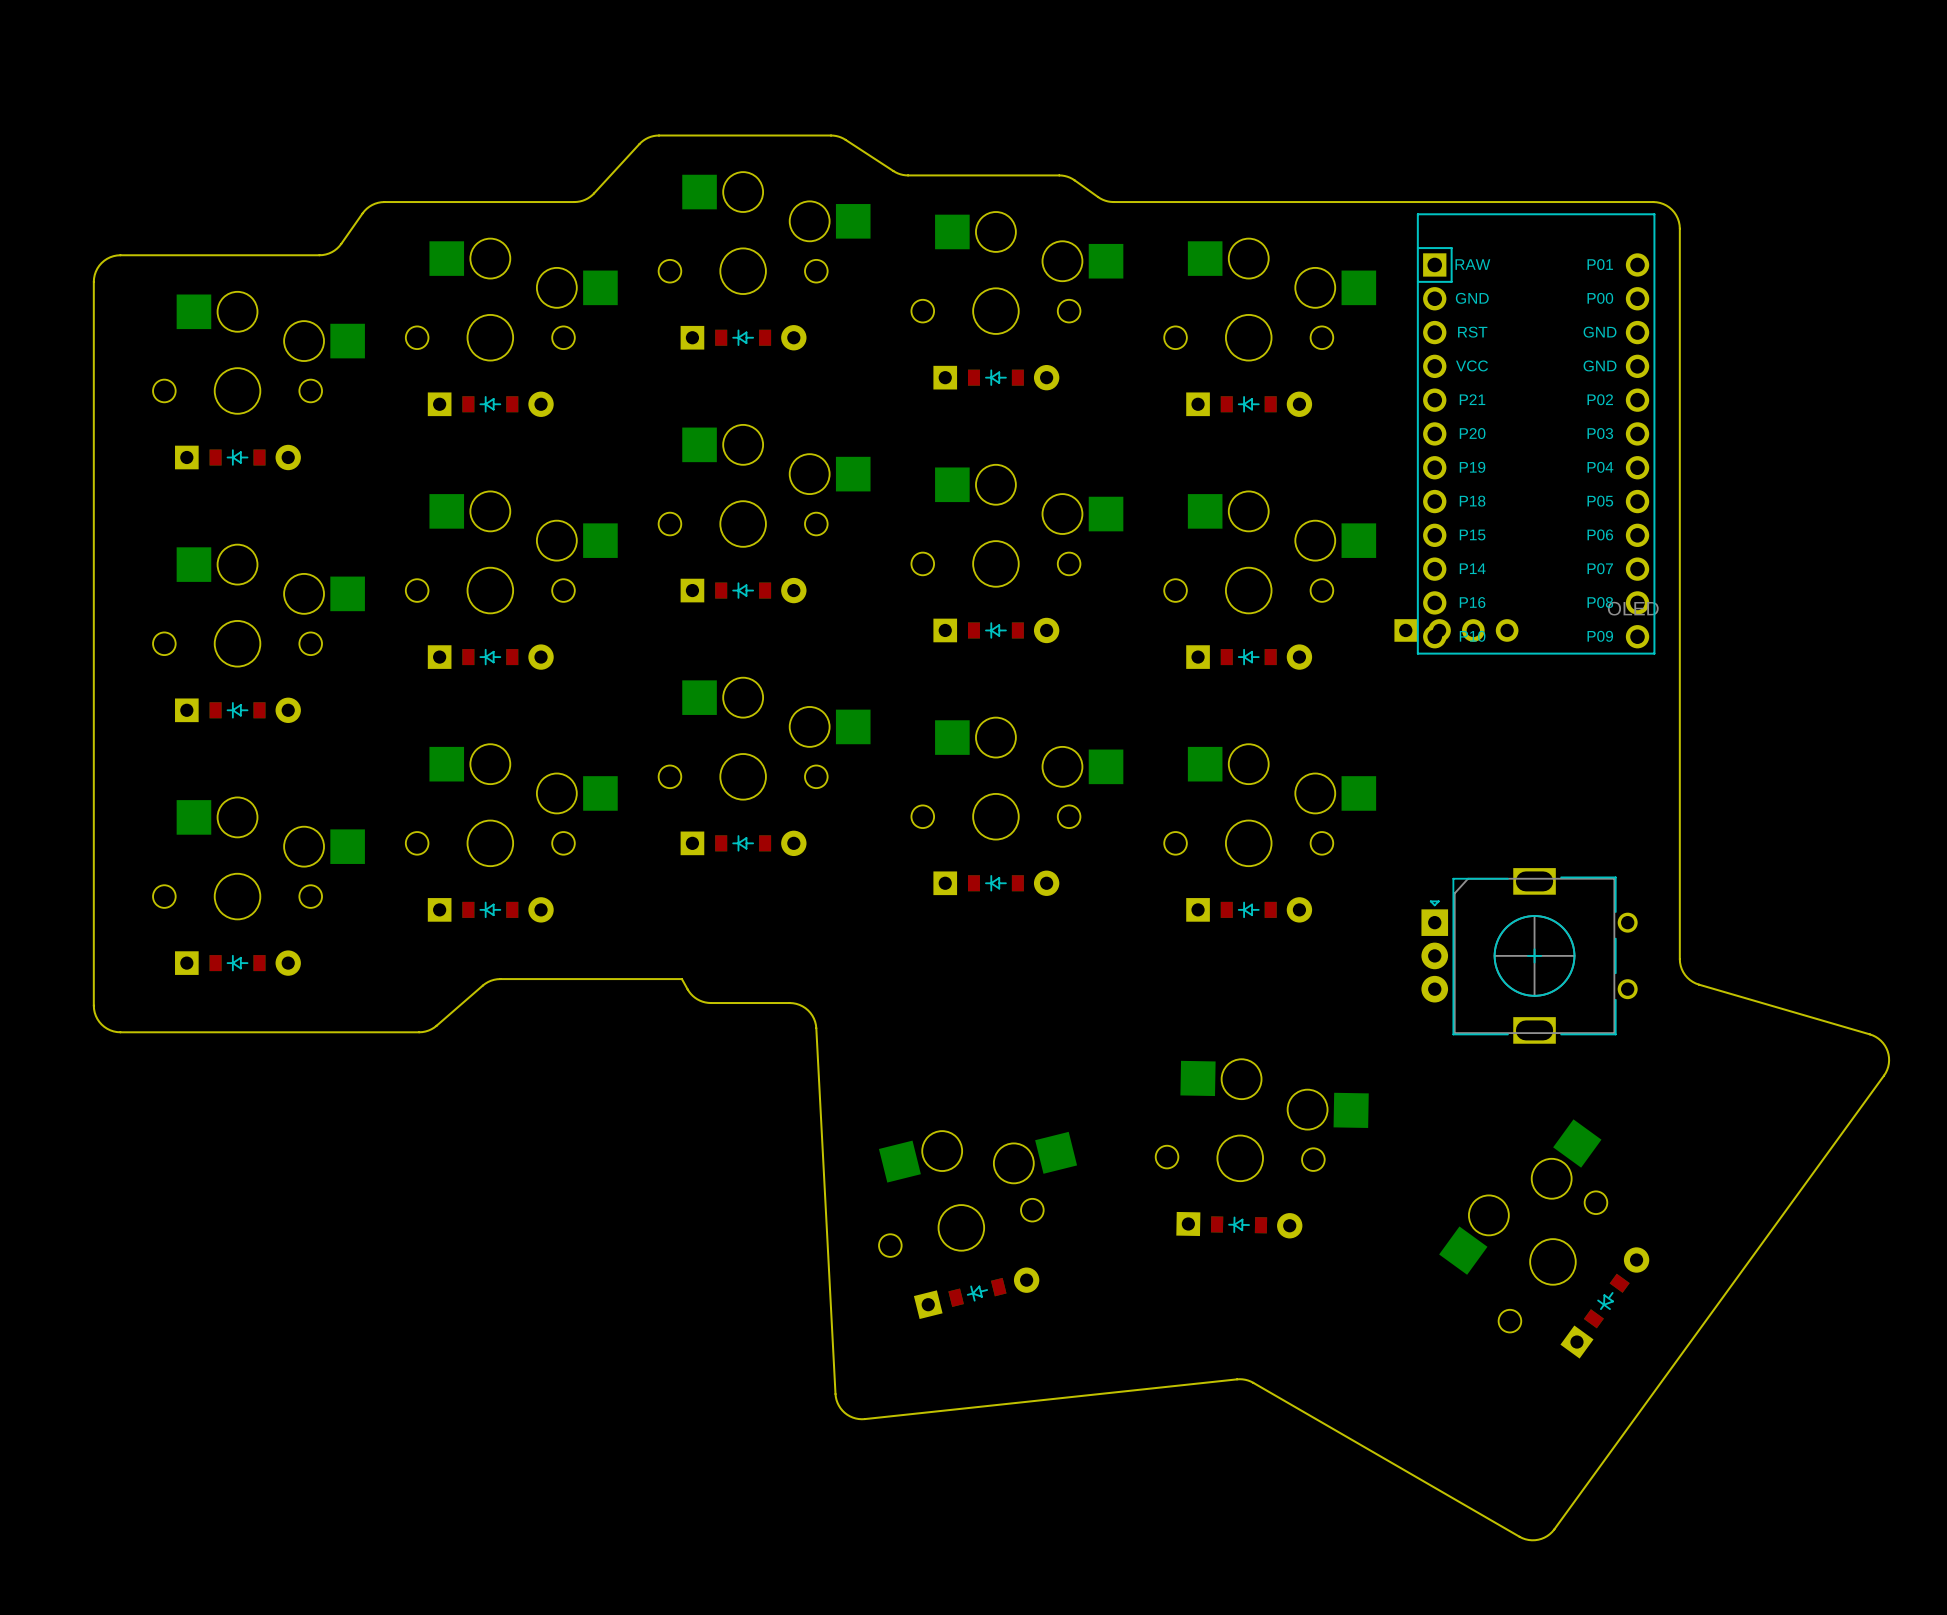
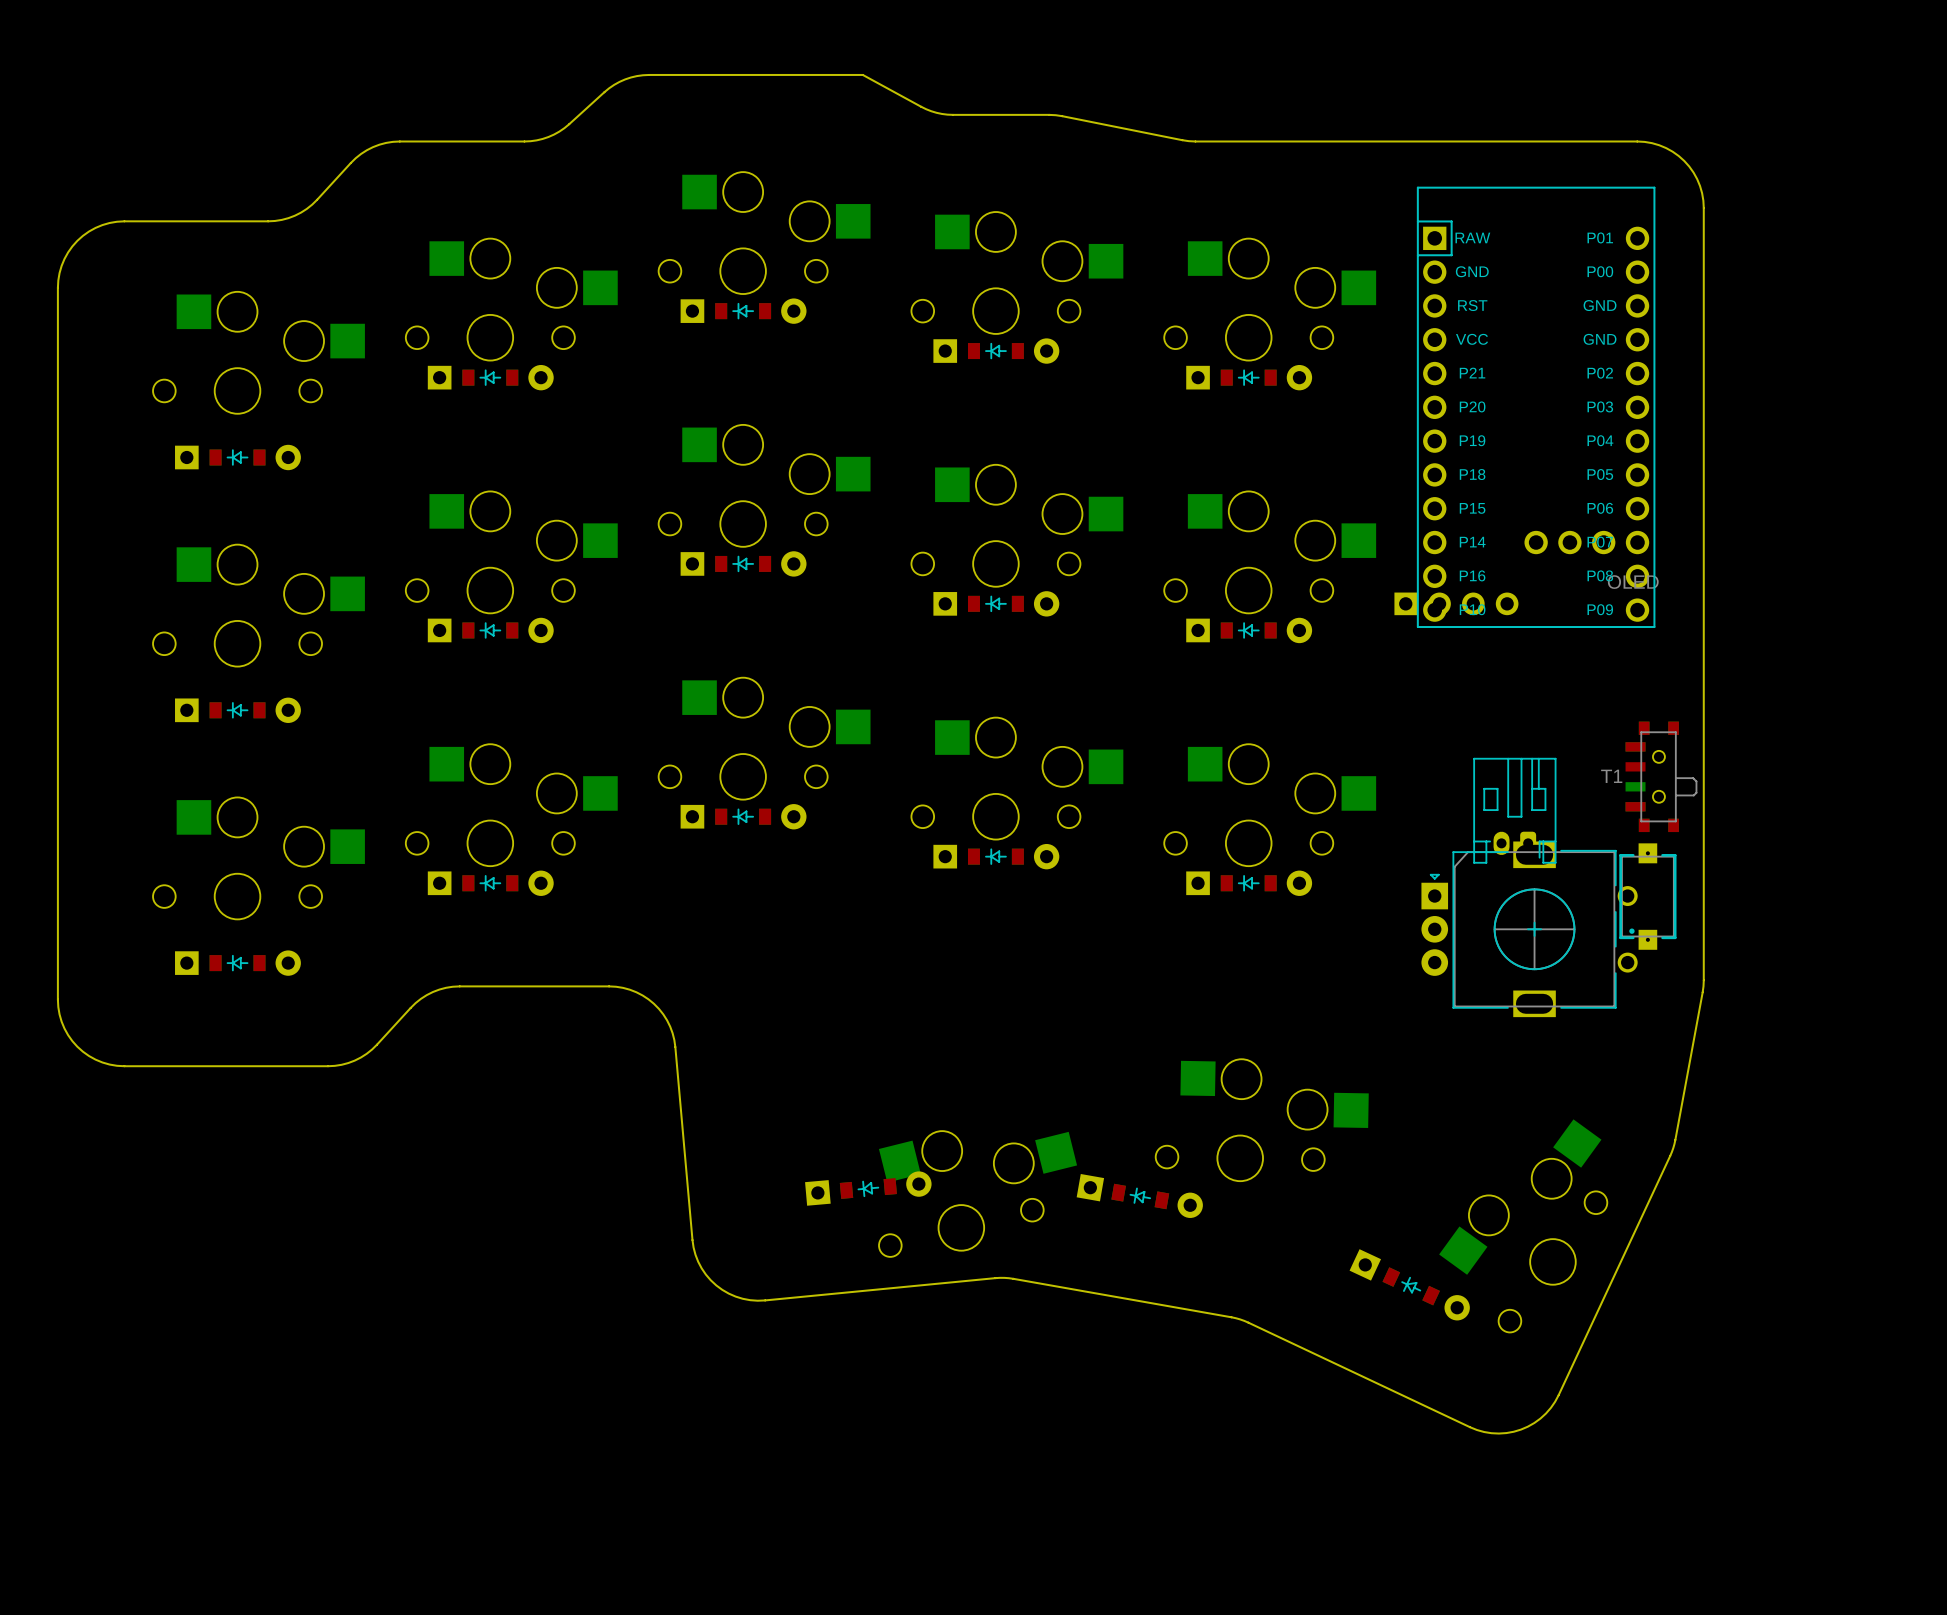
board edge: (659, 135) (836, 135) (902, 174) (1062, 175) (1072, 178) (1100, 198) (1110, 201) (1653, 202) (1666, 205) (1676, 215) (1679, 228) (1680, 965) (1687, 977) (1699, 984) (1872, 1035) (1884, 1045) (1888, 1054) (1888, 1063) (1884, 1075) (1554, 1529) (1547, 1536) (1531, 1540) (1519, 1536) (1245, 1379) (864, 1419) (855, 1418) (847, 1414) (838, 1405) (835, 1394) (815, 1024) (810, 1012) (799, 1004) (789, 1003) (705, 1002) (692, 995) (681, 979) (500, 979) (485, 983) (434, 1027) (422, 1032) (120, 1032) (107, 1028) (97, 1018) (93, 1005) (93, 281) (97, 268) (107, 258) (120, 255) (325, 254) (339, 246) (366, 208) (381, 202) (579, 201) (592, 195) (641, 142) (650, 136) (659, 135) -> (649, 74) (630, 77) (614, 84) (564, 128) (542, 138) (524, 141) (399, 141) (373, 147) (355, 158) (312, 204) (288, 218) (268, 221) (116, 221) (102, 225) (89, 231) (77, 240) (68, 252) (59, 273) (57, 287) (57, 999) (59, 1014) (68, 1035) (77, 1046) (89, 1056) (102, 1062) (116, 1065) (334, 1065) (348, 1063) (366, 1053) (415, 1003) (439, 989) (459, 986) (623, 987) (642, 995) (653, 1003) (667, 1020) (672, 1033) (693, 1247) (698, 1261) (705, 1274) (716, 1285) (728, 1293) (742, 1298) (765, 1300) (995, 1278) (1013, 1278) (1240, 1319) (1470, 1427) (1484, 1432) (1499, 1433) (1513, 1431) (1534, 1422) (1545, 1413) (1558, 1395) (1671, 1152) (1703, 986) (1703, 208) (1700, 186) (1693, 172) (1684, 160) (1672, 151) (1659, 145) (1644, 141) (1188, 141) (1055, 115) (942, 113) (921, 106) (862, 74) (649, 74)
part position: (743, 337) -> (743, 311)
part position: (996, 377) -> (996, 351)
part position: (490, 404) -> (490, 377)
part position: (1249, 404) -> (1249, 377)
part: none -> (1536, 407)
part: (1536, 433) -> none
part position: (743, 590) -> (743, 563)
part position: (996, 630) -> (996, 603)
part position: (1456, 630) -> (1456, 603)
part position: (490, 657) -> (490, 630)
part position: (1249, 657) -> (1249, 630)
T1: none -> (1661, 776)
part: none -> (1514, 810)
part position: (743, 843) -> (743, 816)
part position: (996, 883) -> (996, 856)
part: none -> (1647, 896)
part position: (490, 909) -> (490, 883)
part position: (1249, 909) -> (1249, 883)
part position: (1529, 955) -> (1529, 929)
part: none -> (868, 1188)
part: none -> (1139, 1195)
part: (1239, 1225) -> none
part: none -> (1409, 1284)
part: (976, 1293) -> none
part: (1604, 1302) -> none

